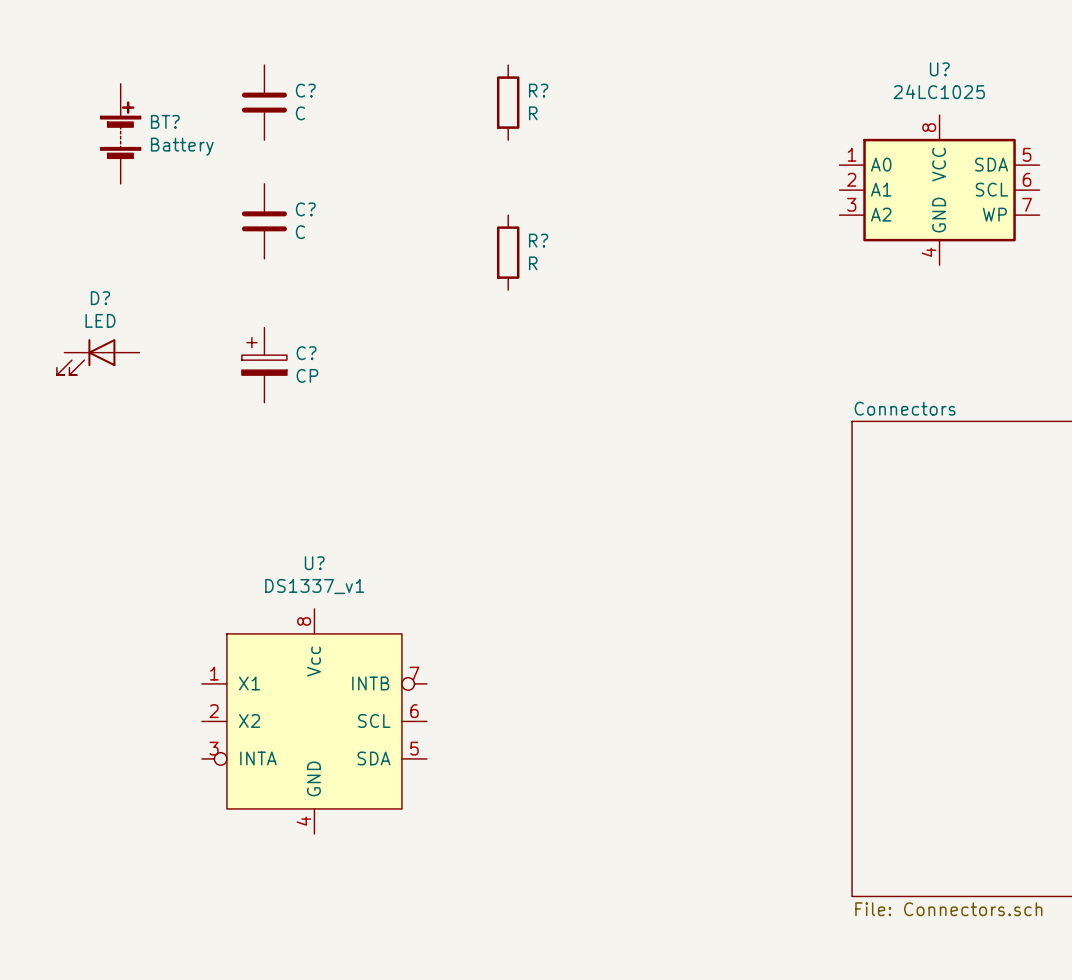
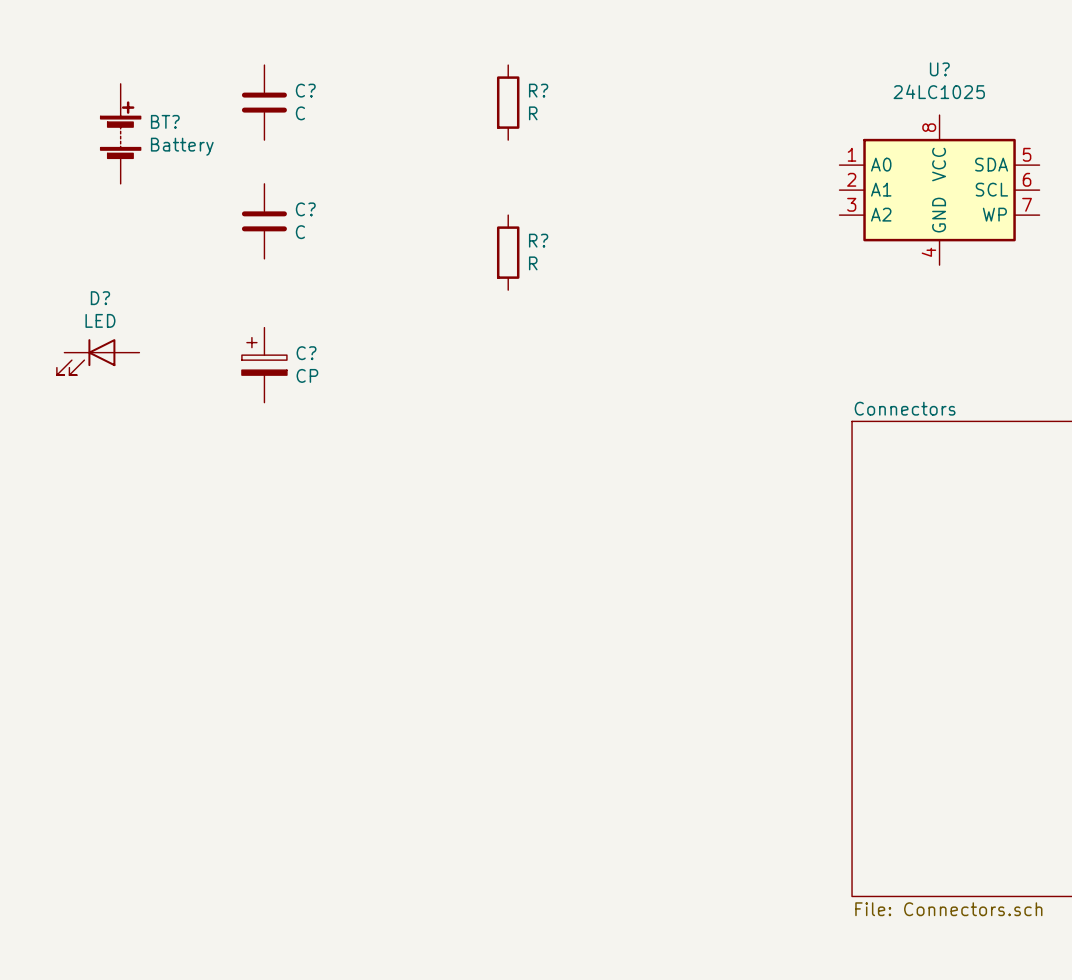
U?: DS1337_v1 (314, 721) -> none

